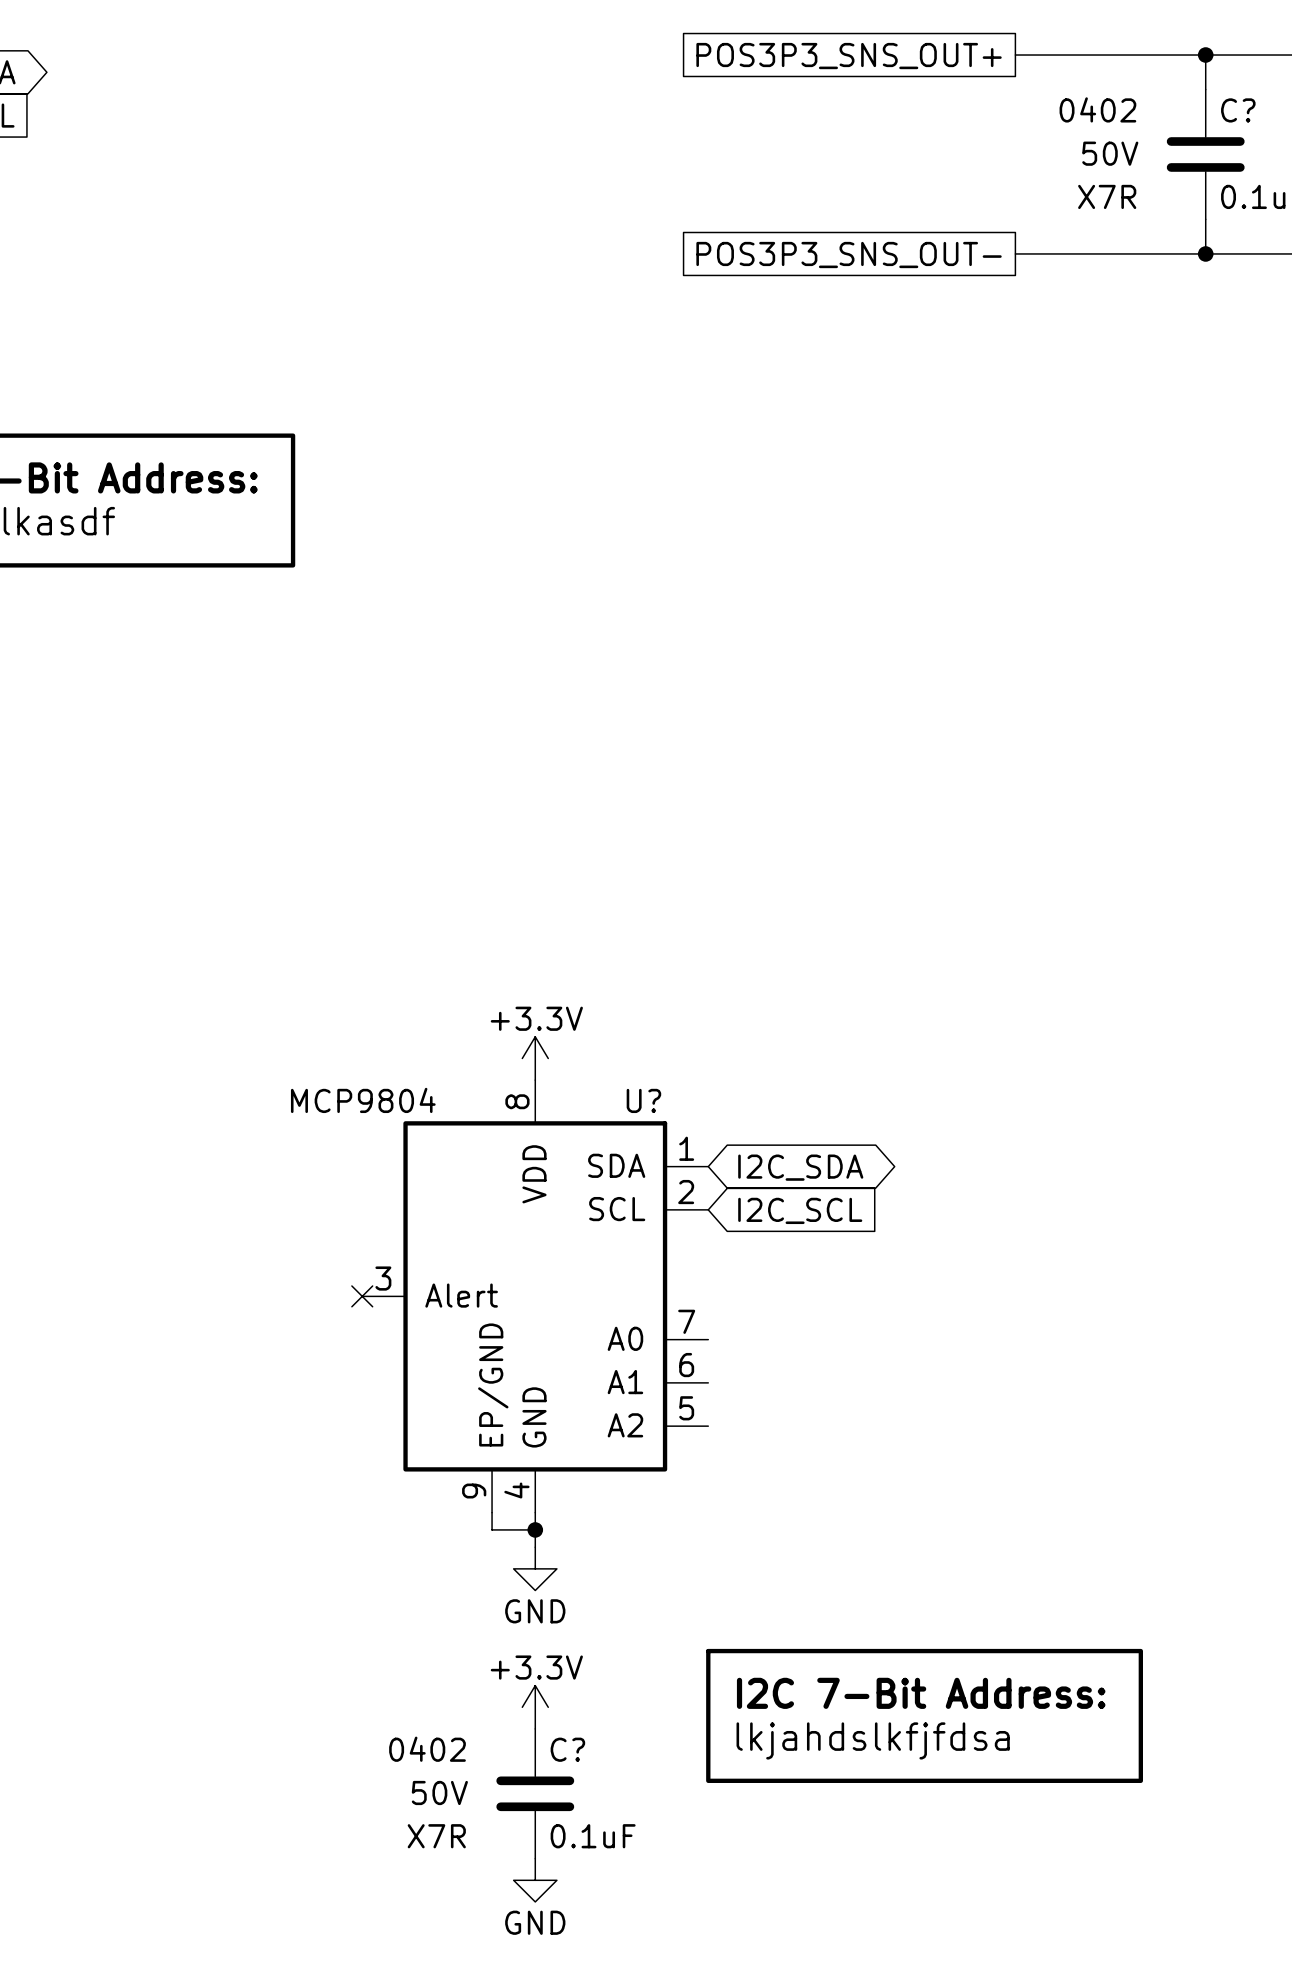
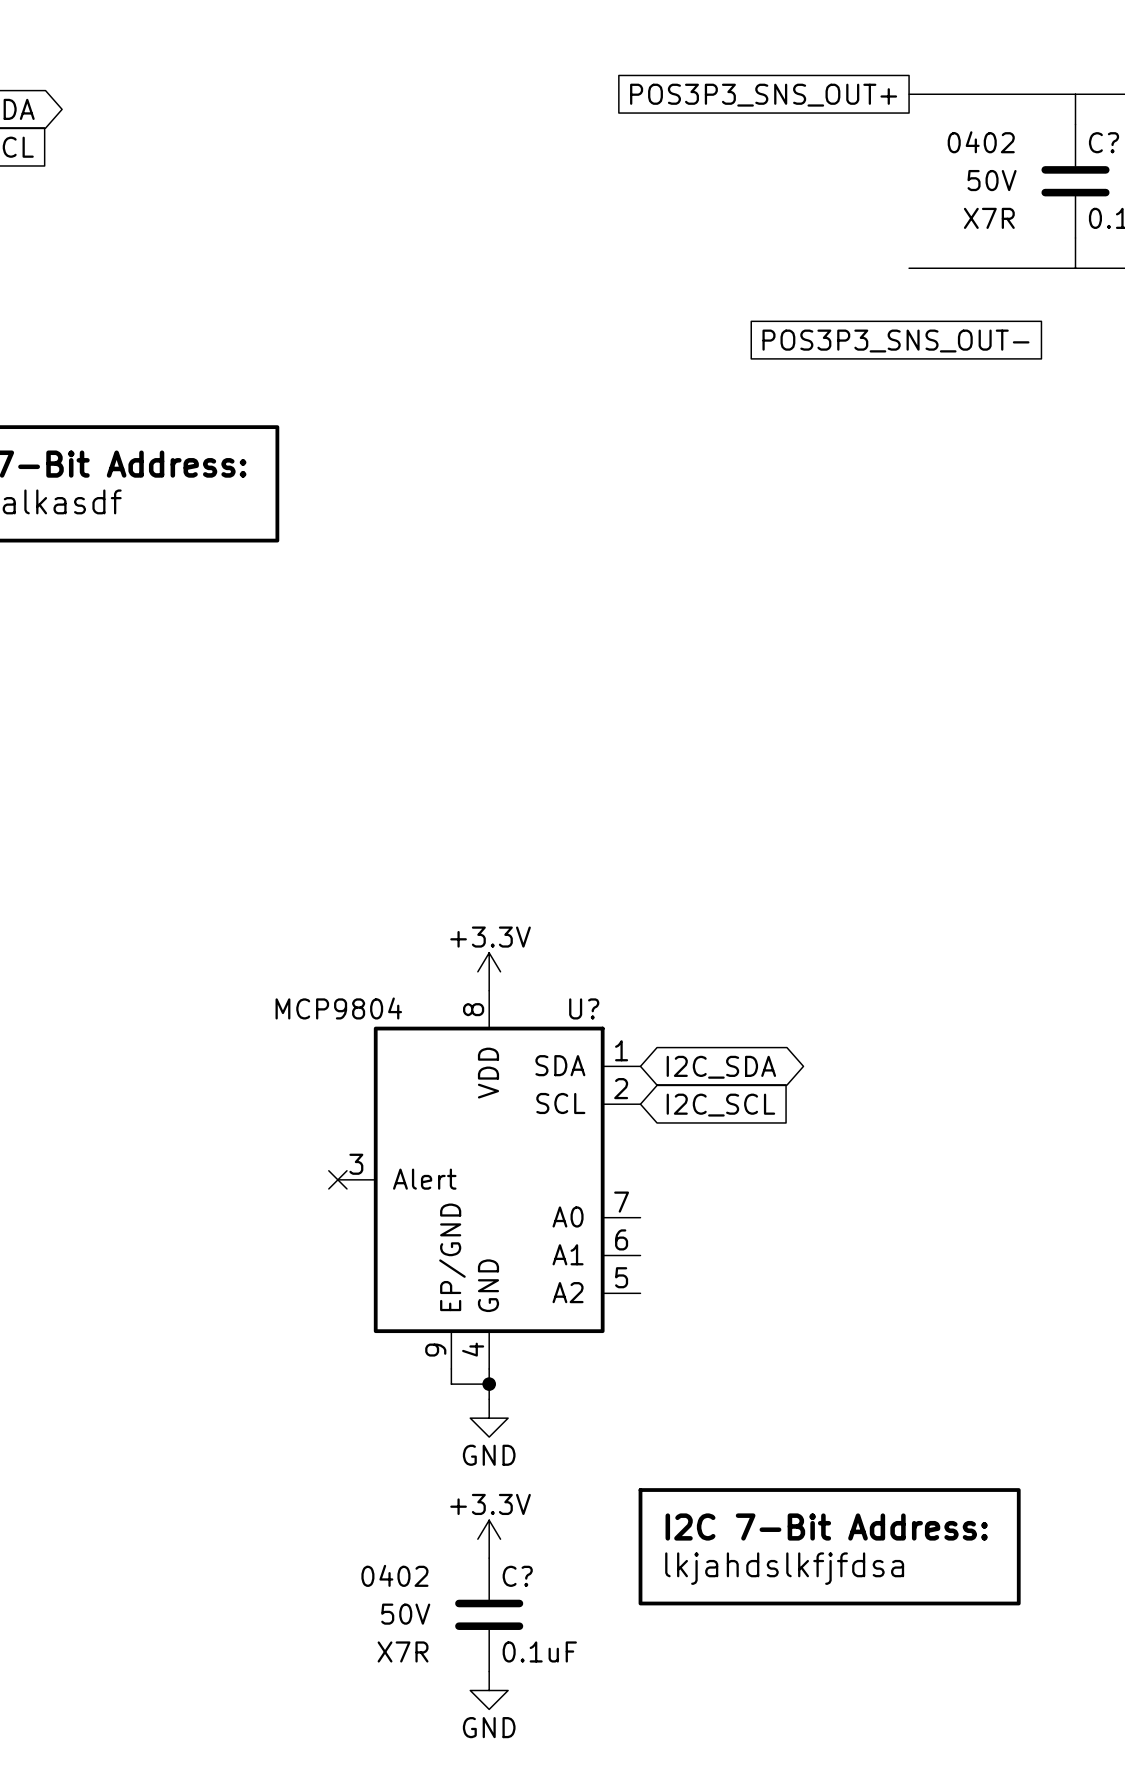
junction: (1205, 55) -> none
junction: (1205, 253) -> none
global label position: POS3P3_SNS_OUT- (849, 255) -> POS3P3_SNS_OUT- (895, 341)

